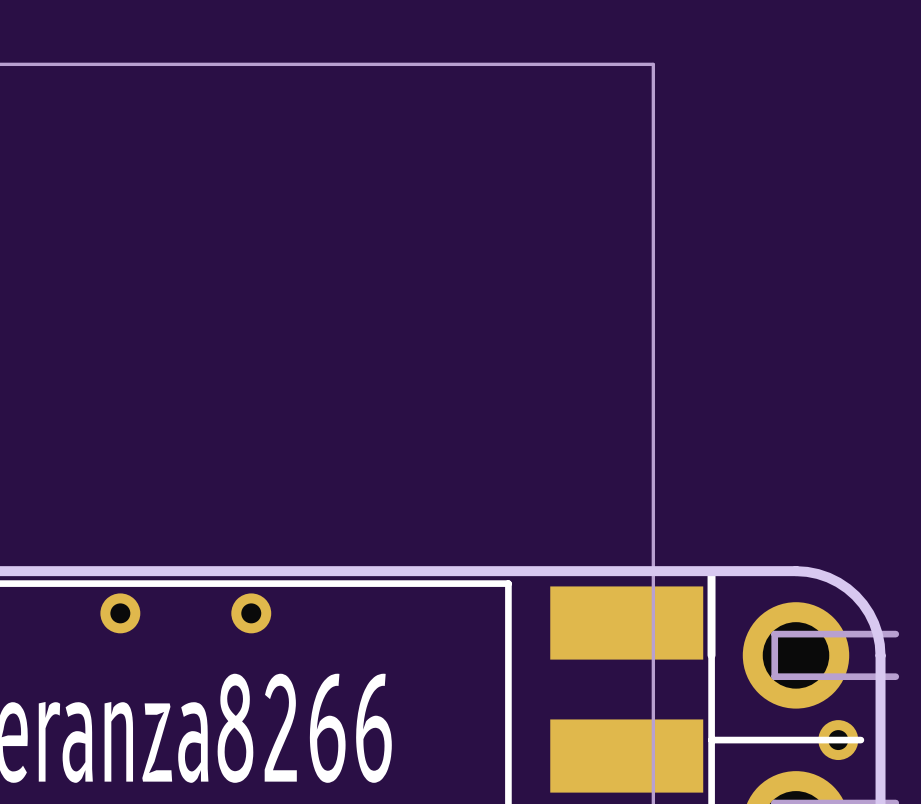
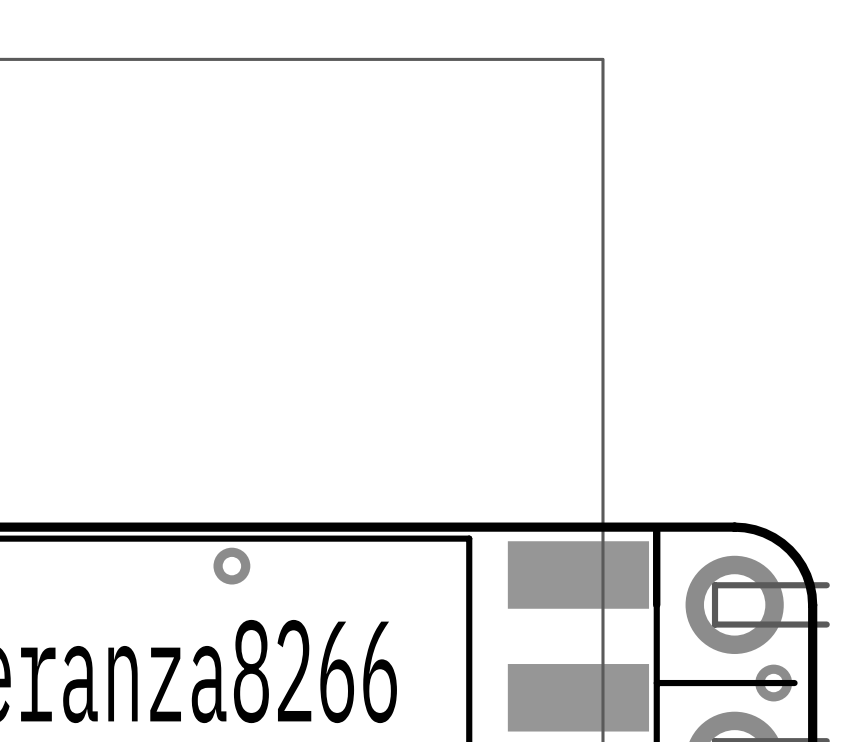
part: (120, 613) -> none

